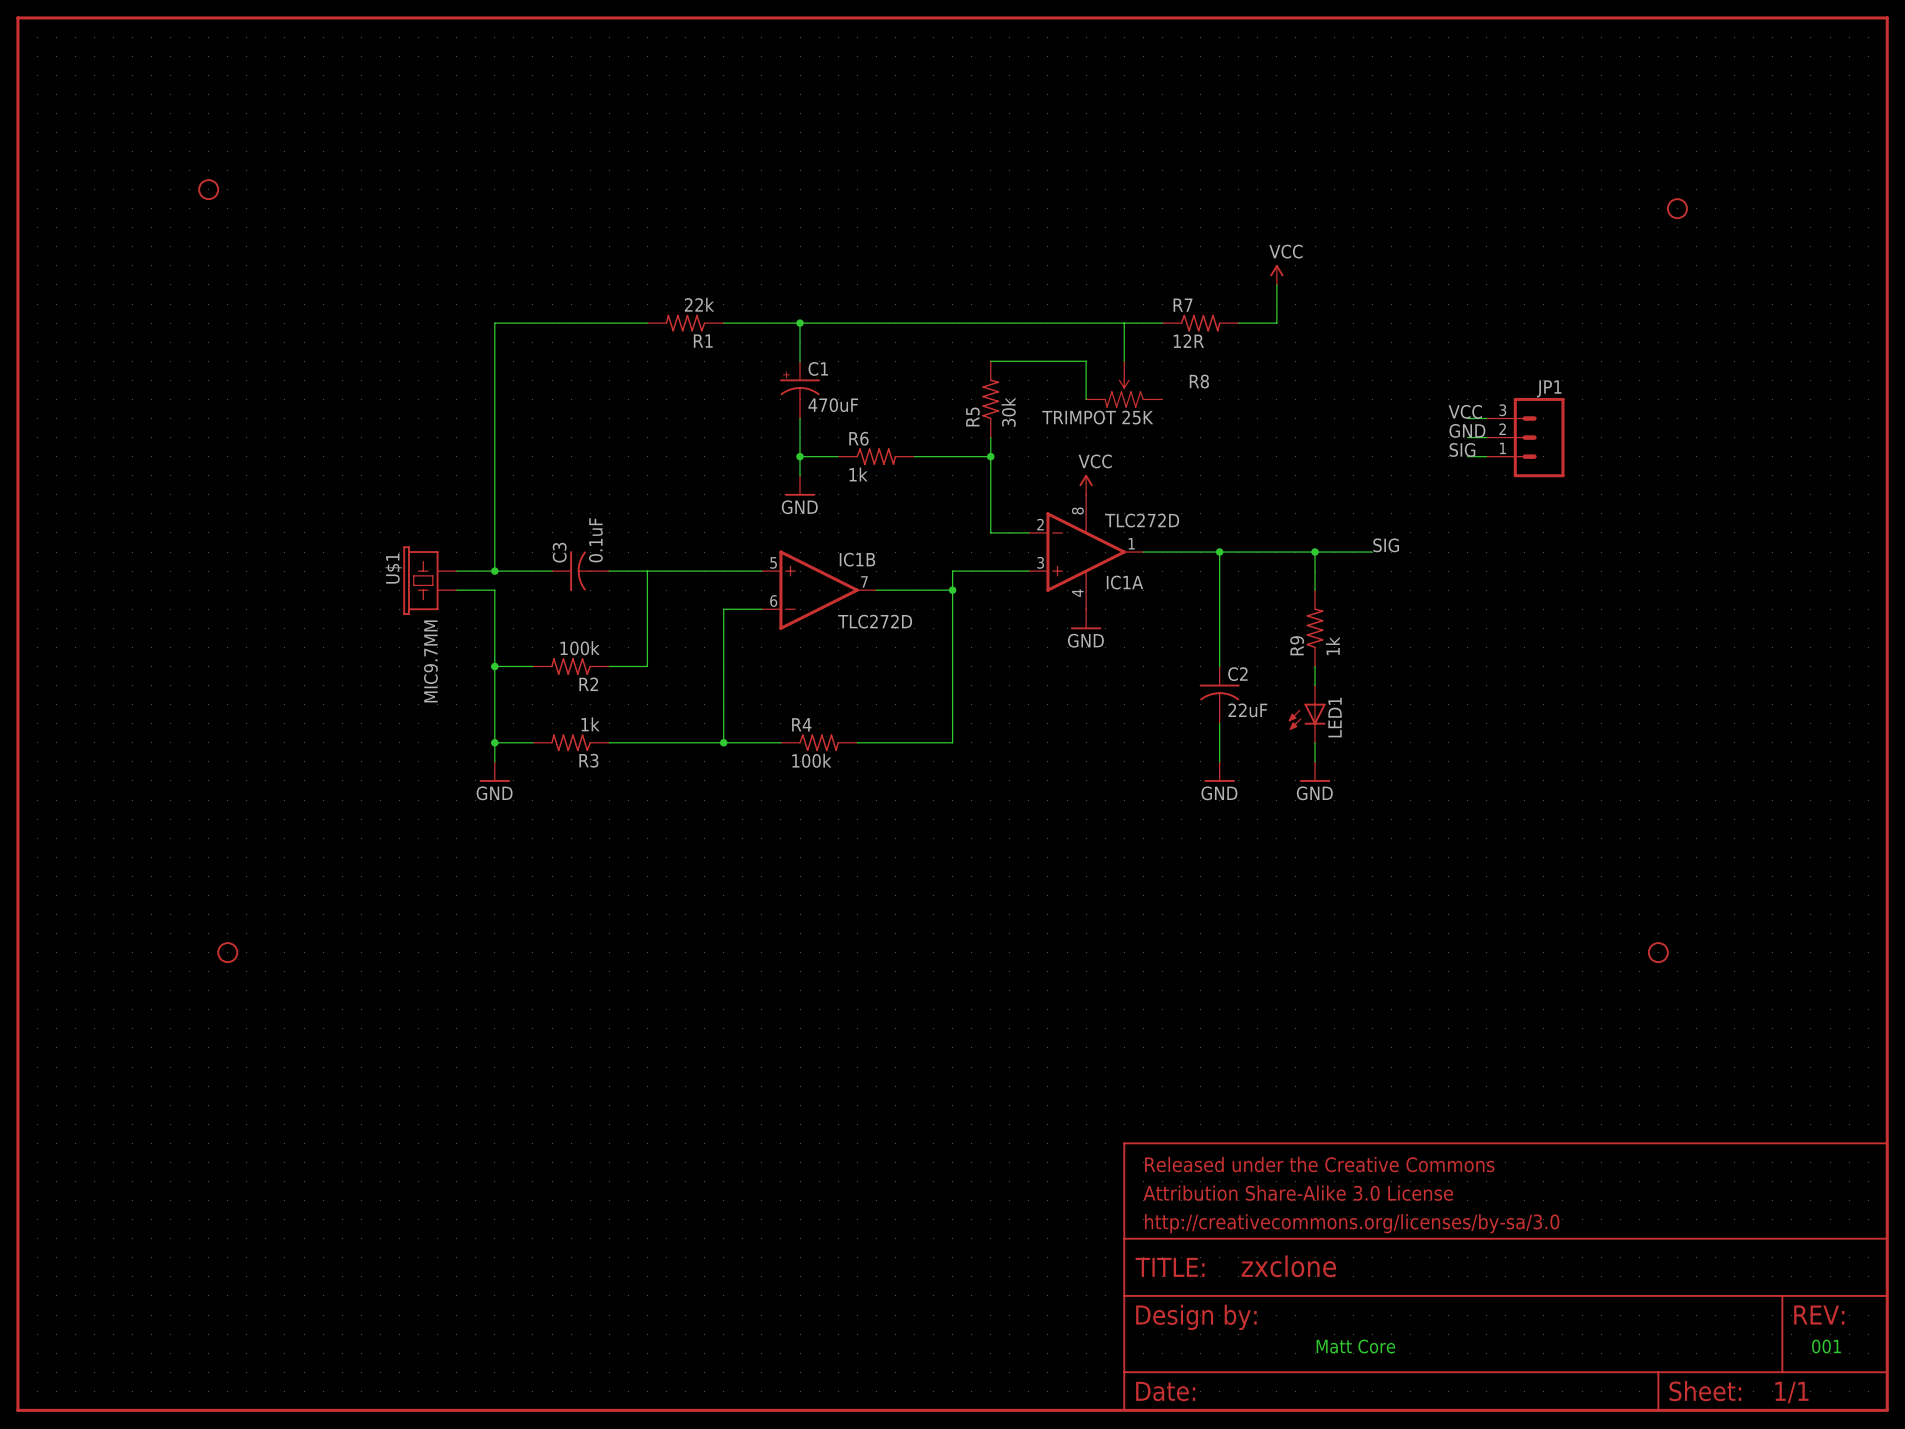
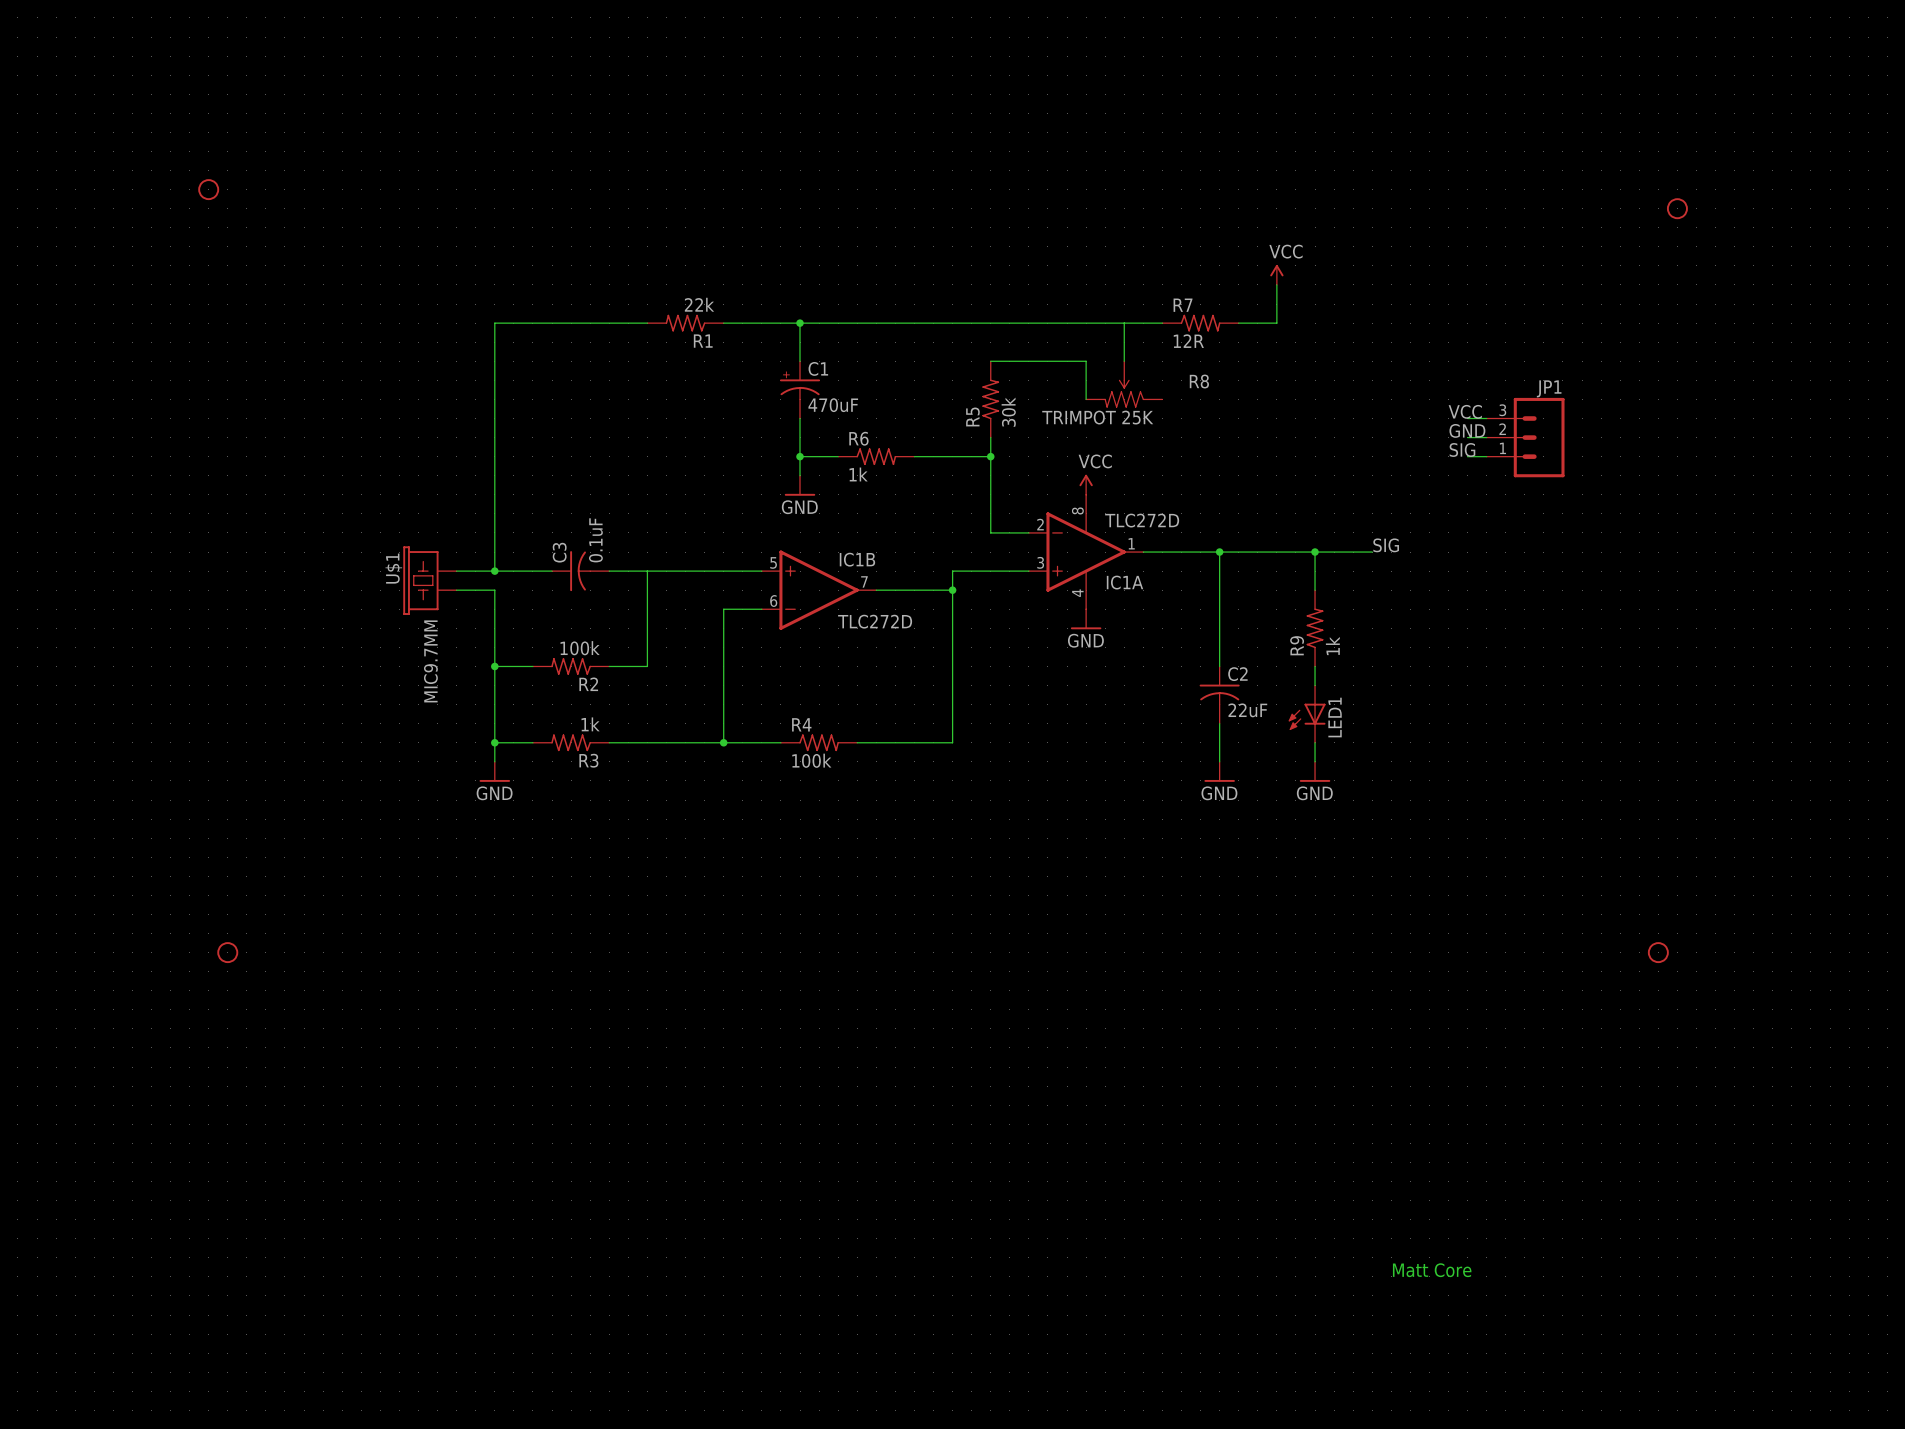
part: (952, 714) -> none
part: (1505, 1276) -> none
text position: Matt Core (1355, 1346) -> Matt Core (1432, 1270)
text: 001 (1826, 1346) -> none

